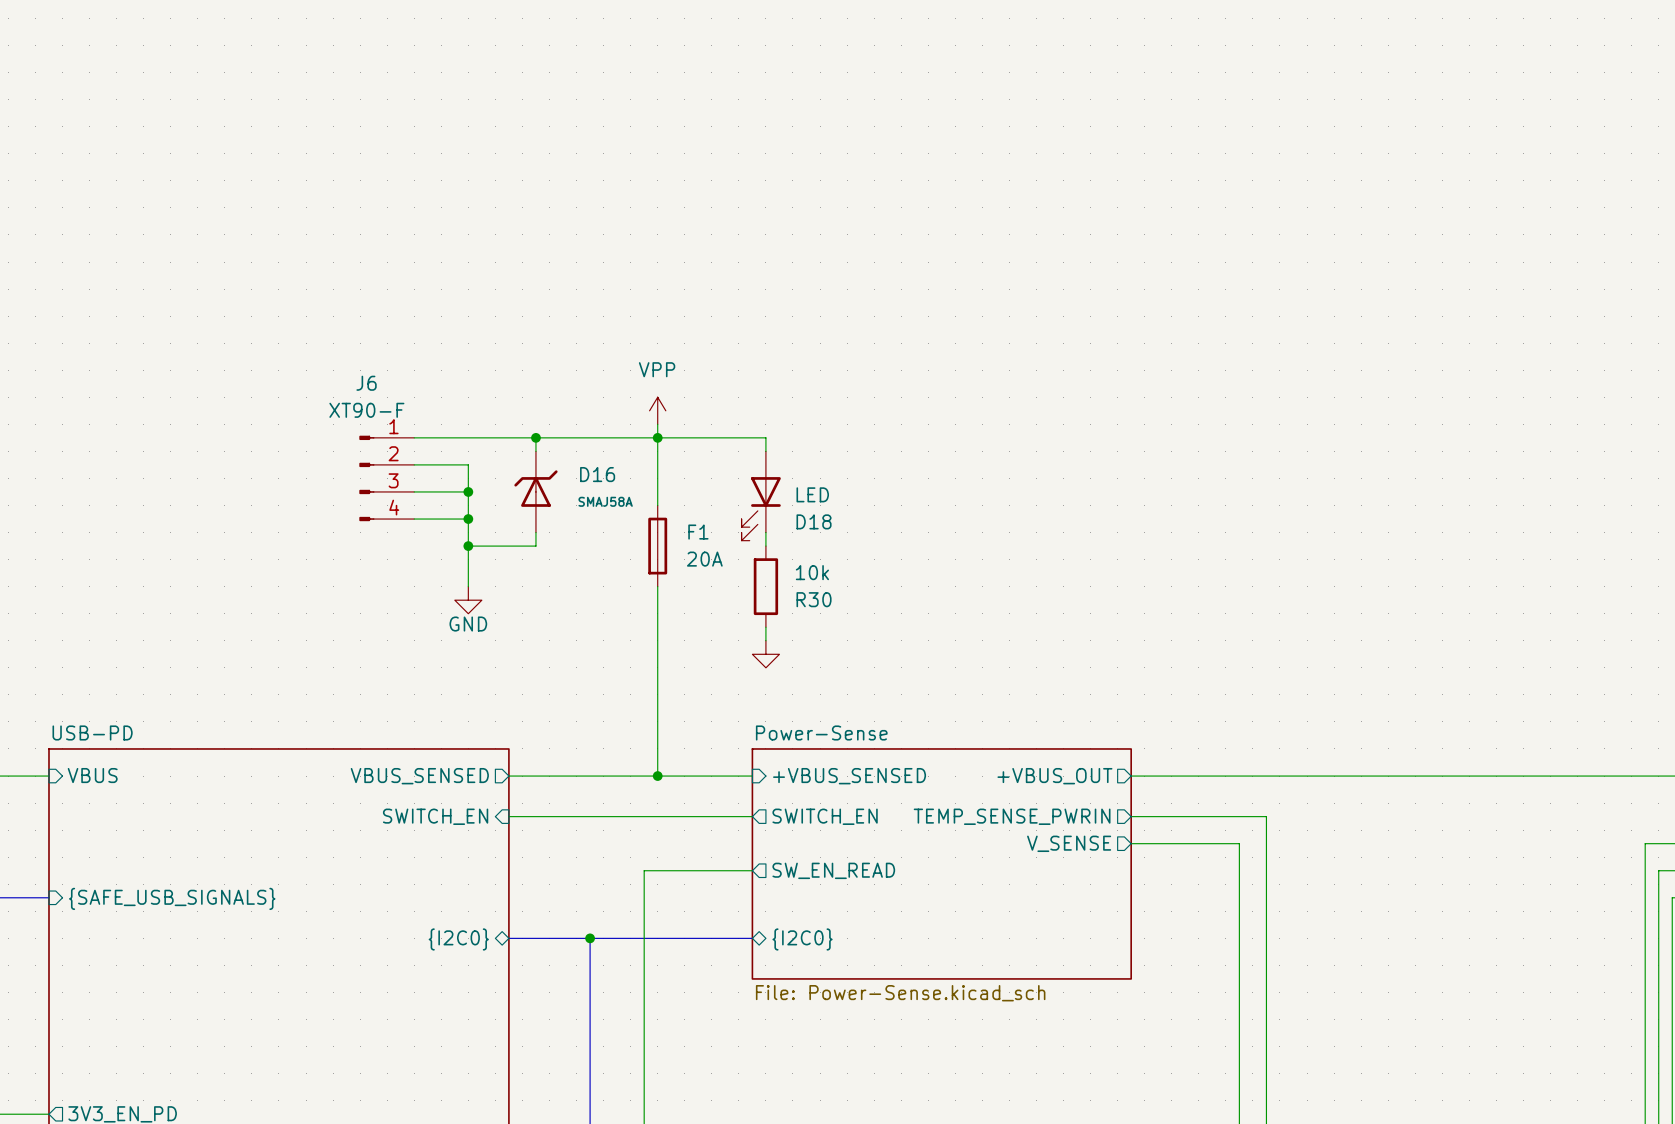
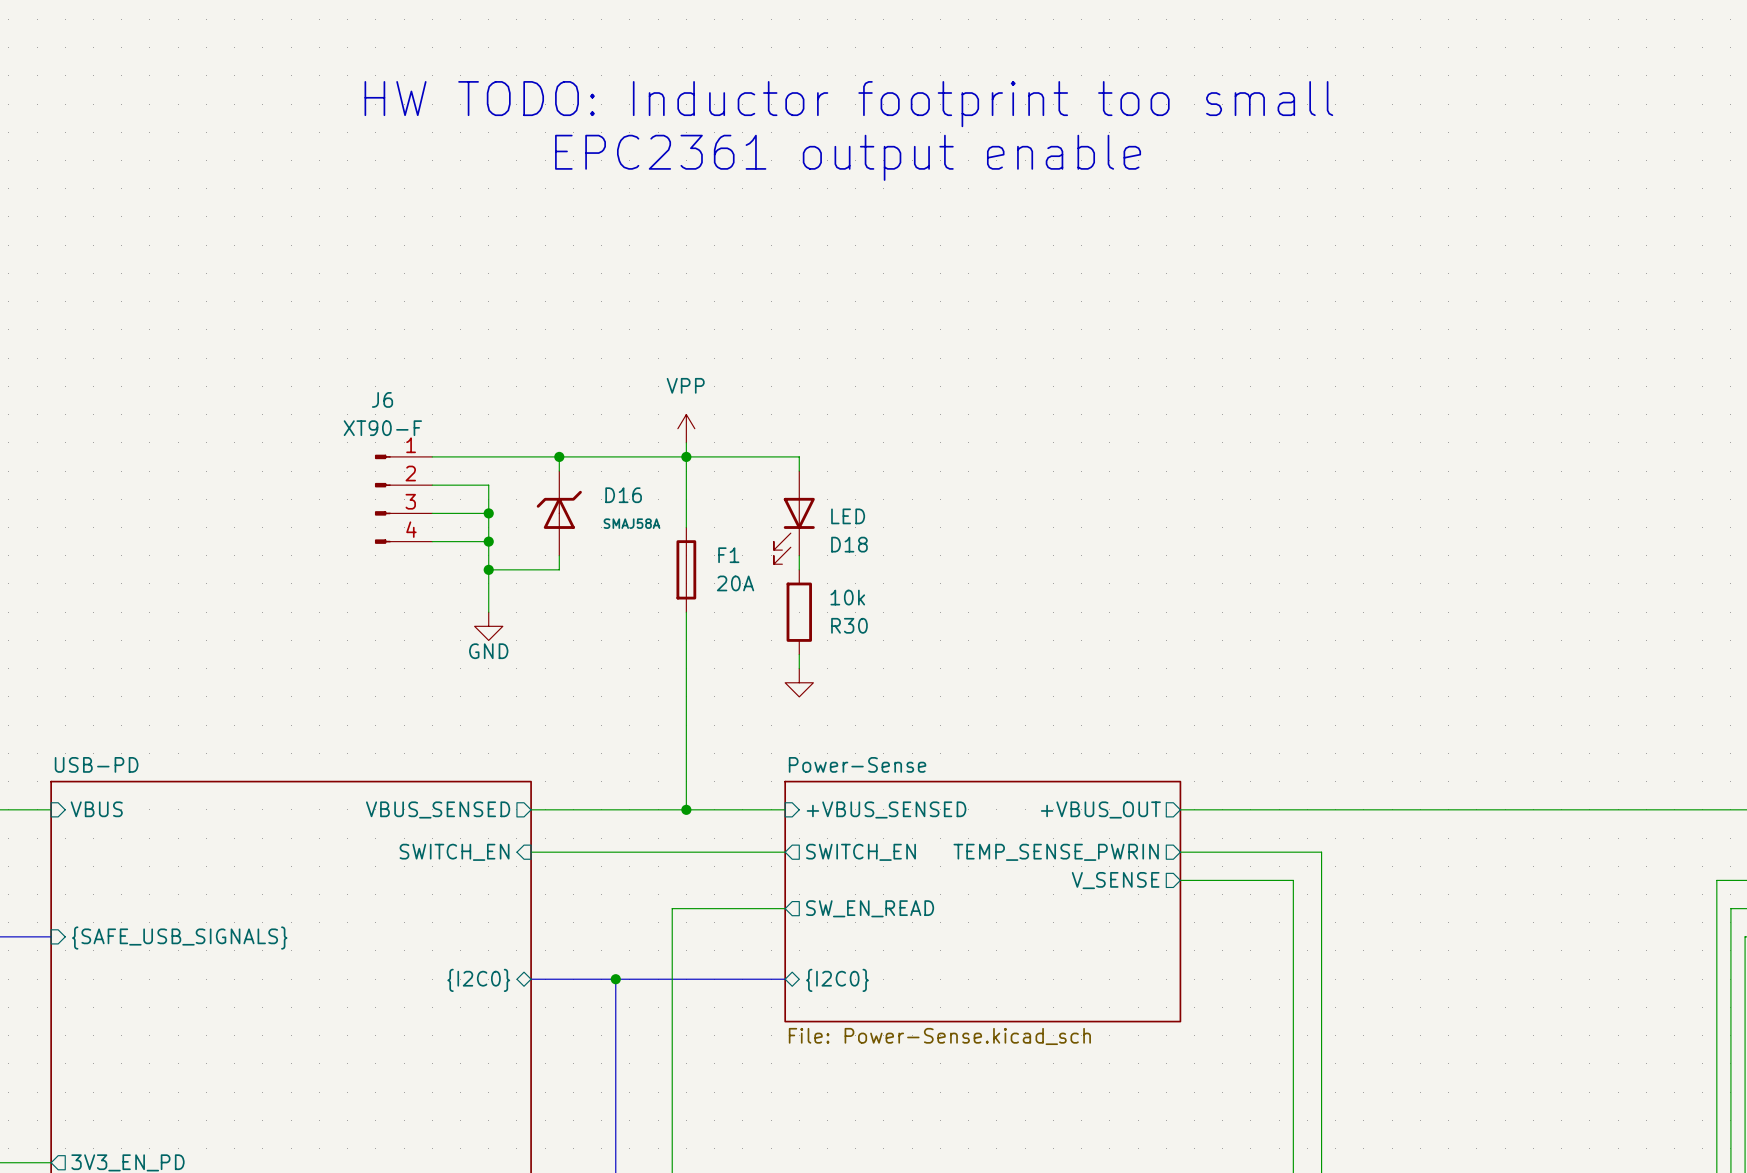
text: none -> HW TODO: Inductor footprint too small (848, 104)
text: none -> EPC2361 output enable (848, 157)

